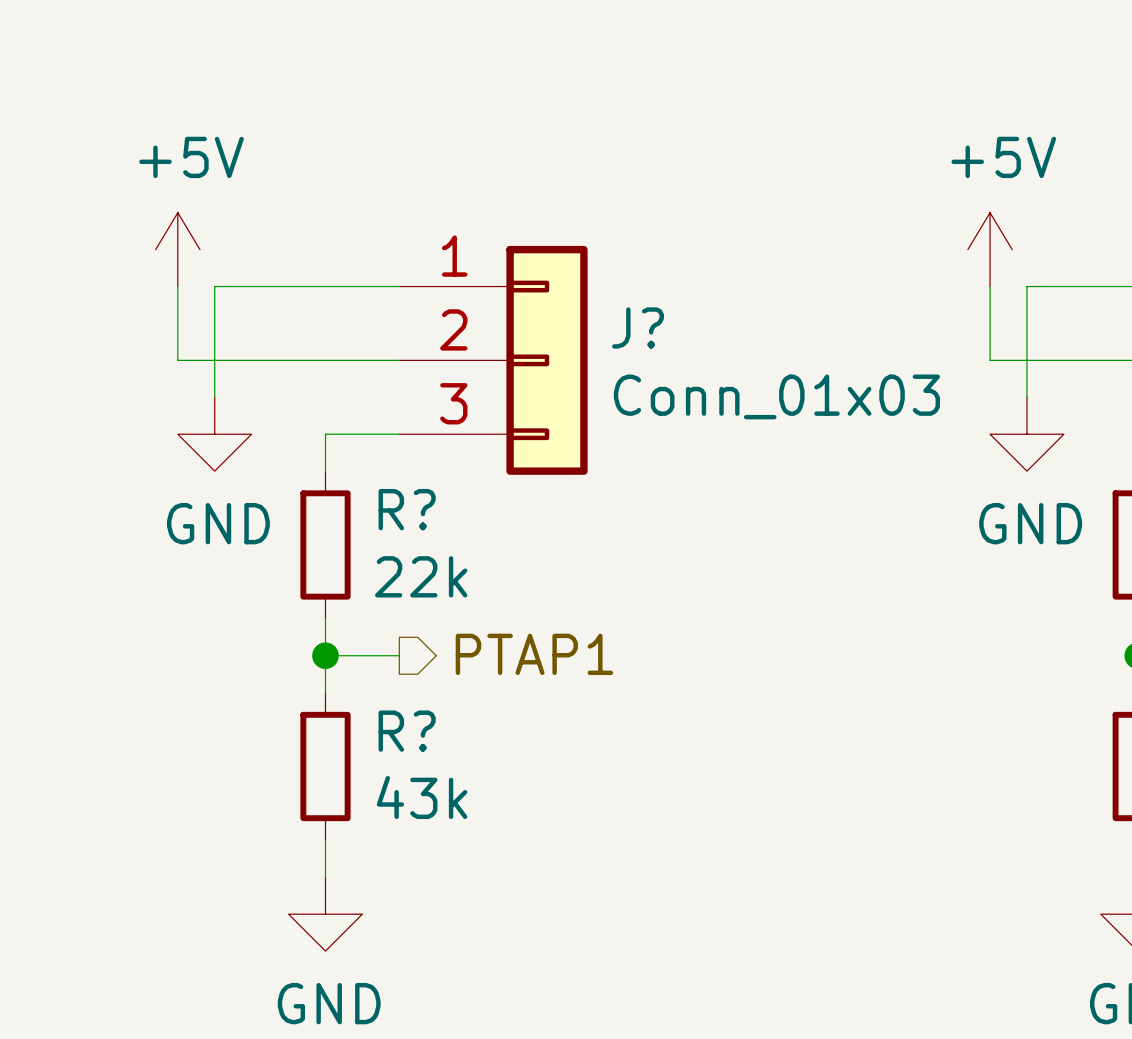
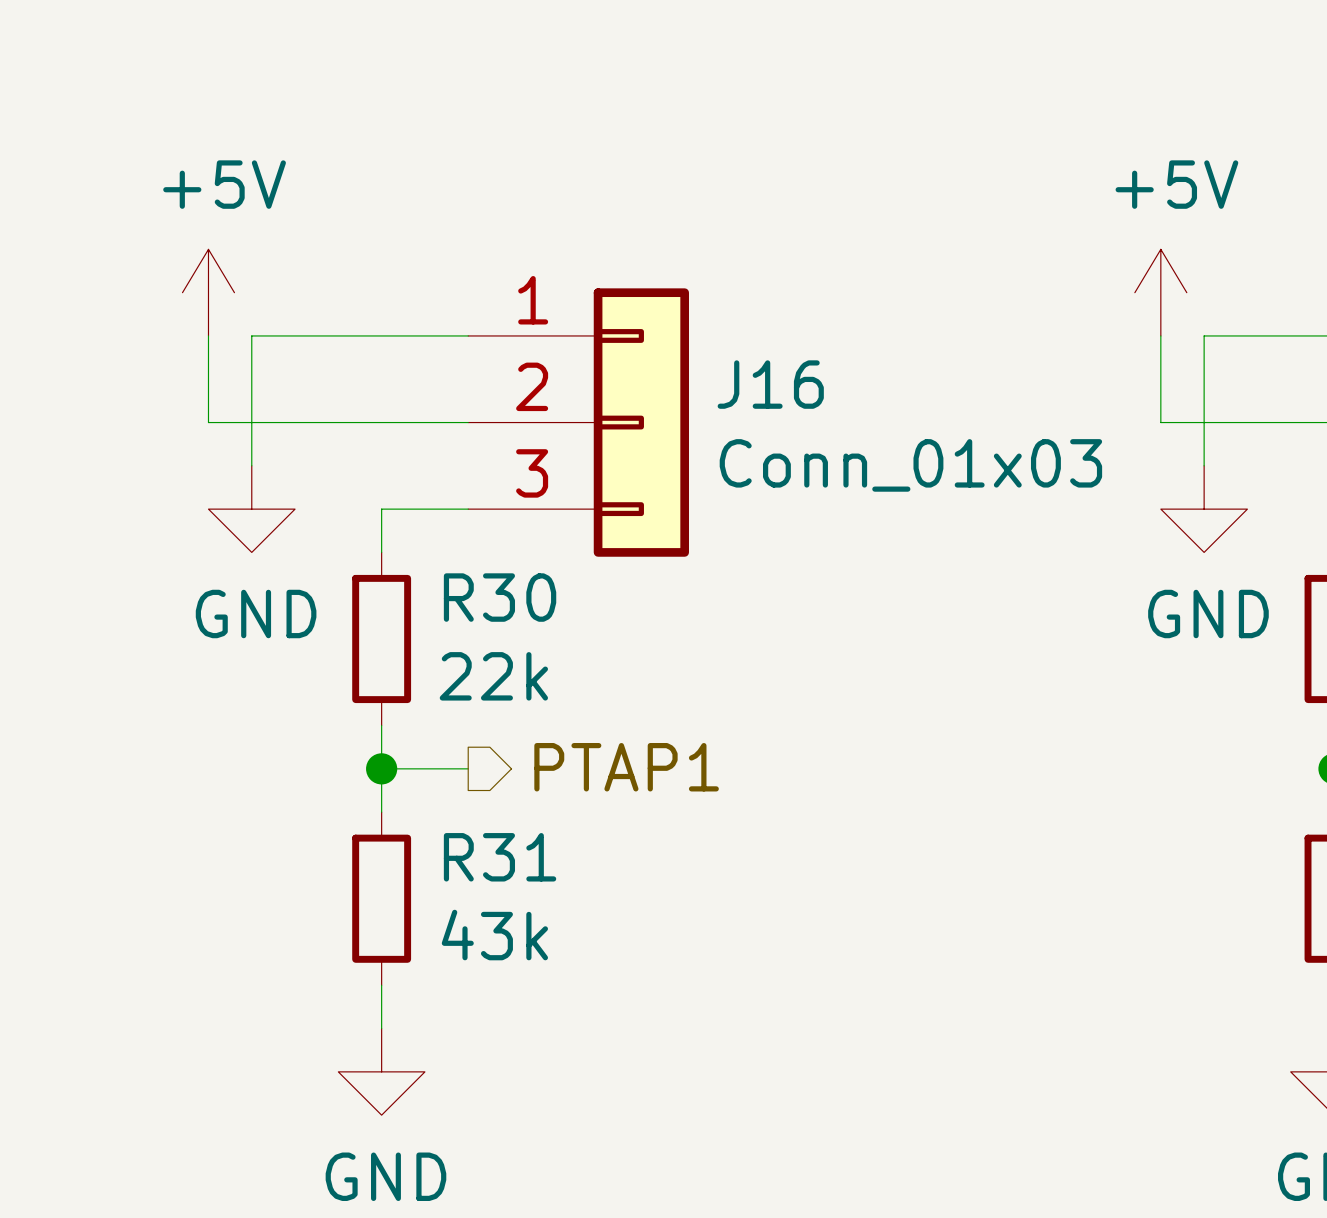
J? name: J? (638, 327) -> J16 (770, 384)
R? name: R? (407, 509) -> R30 (500, 597)
R? name: R? (407, 731) -> R31 (500, 857)

